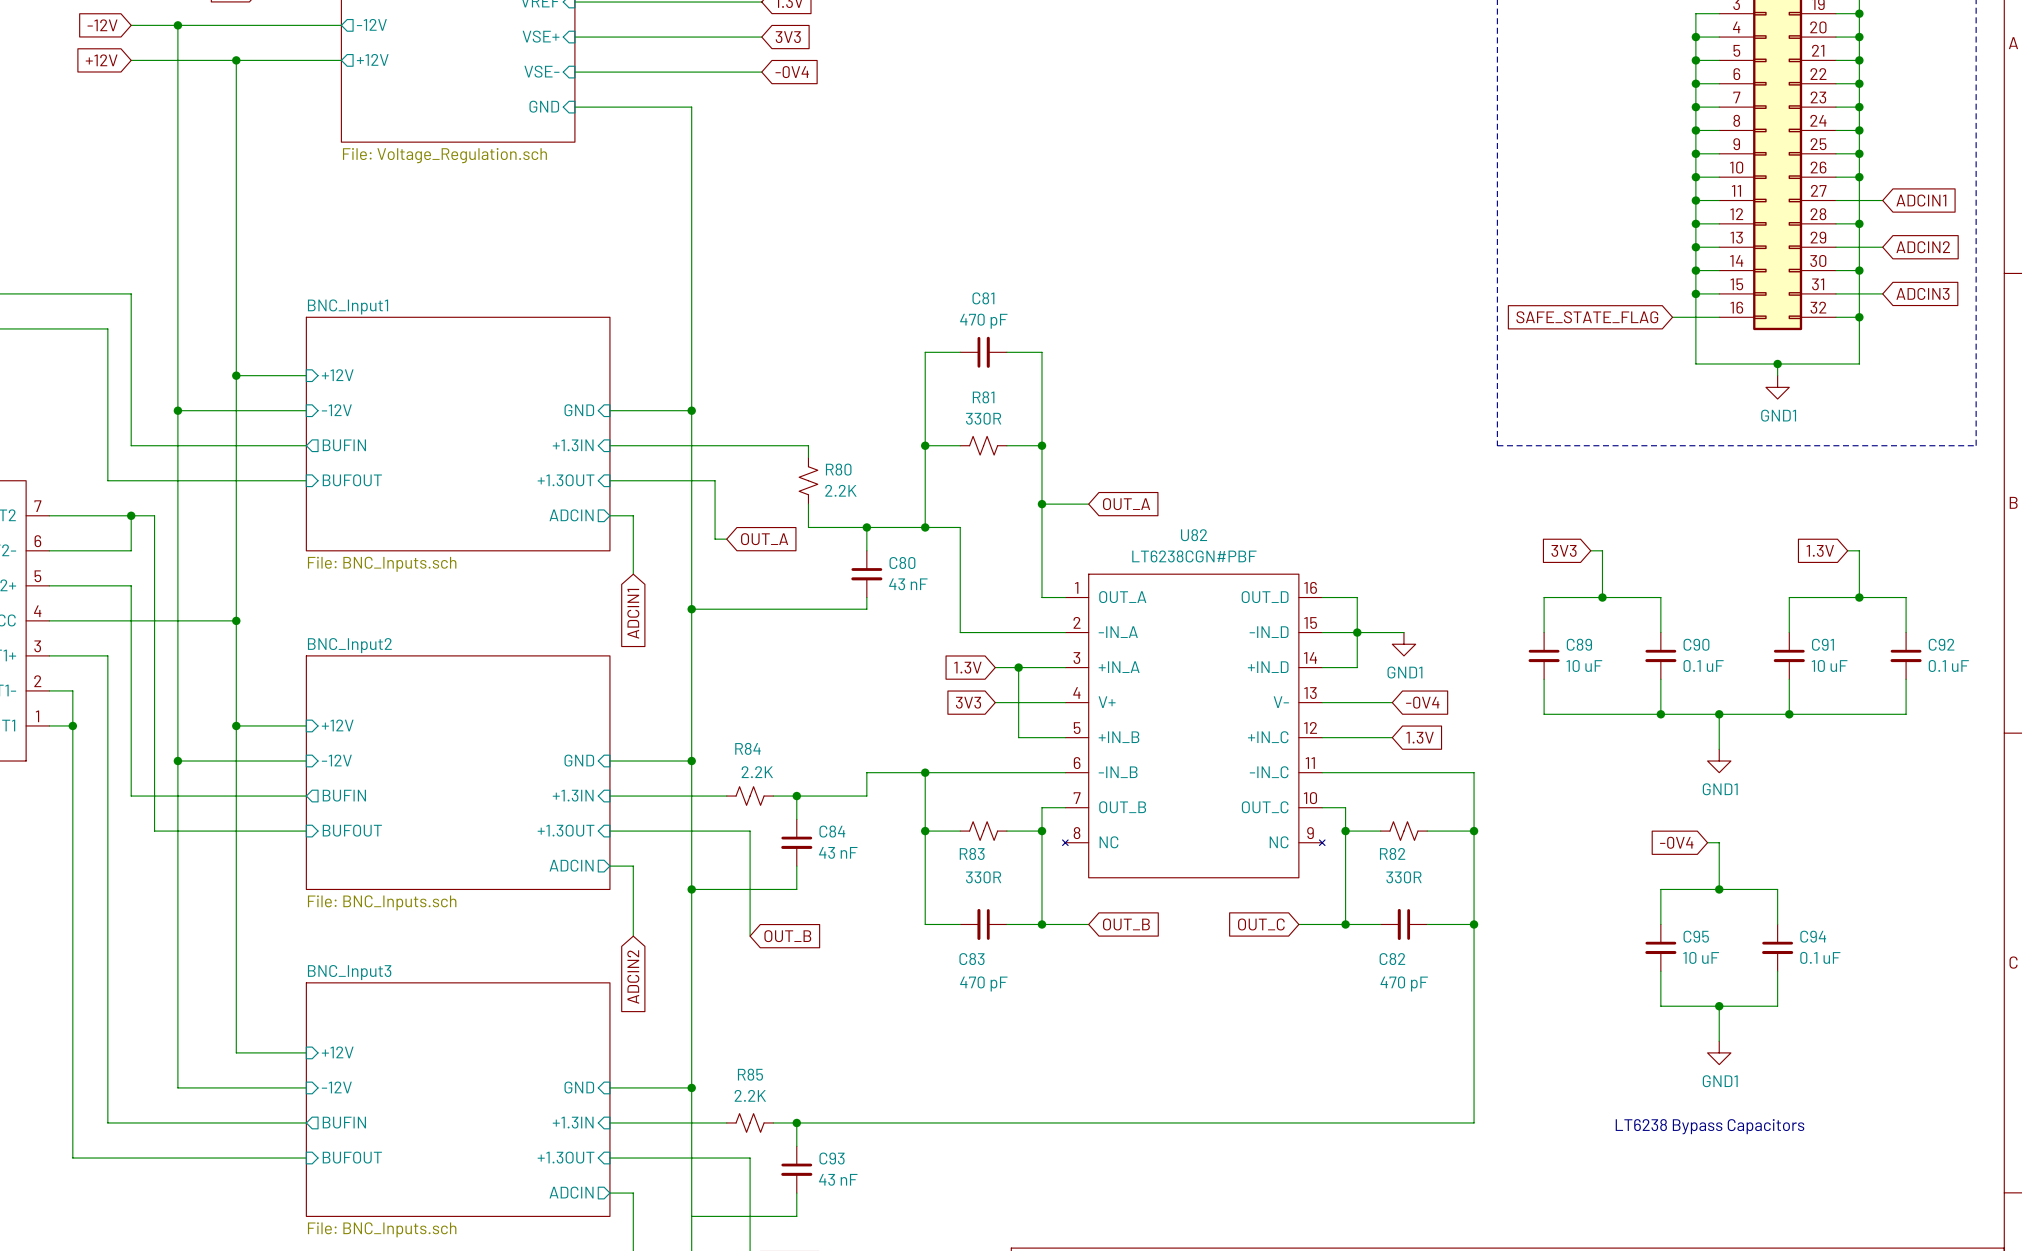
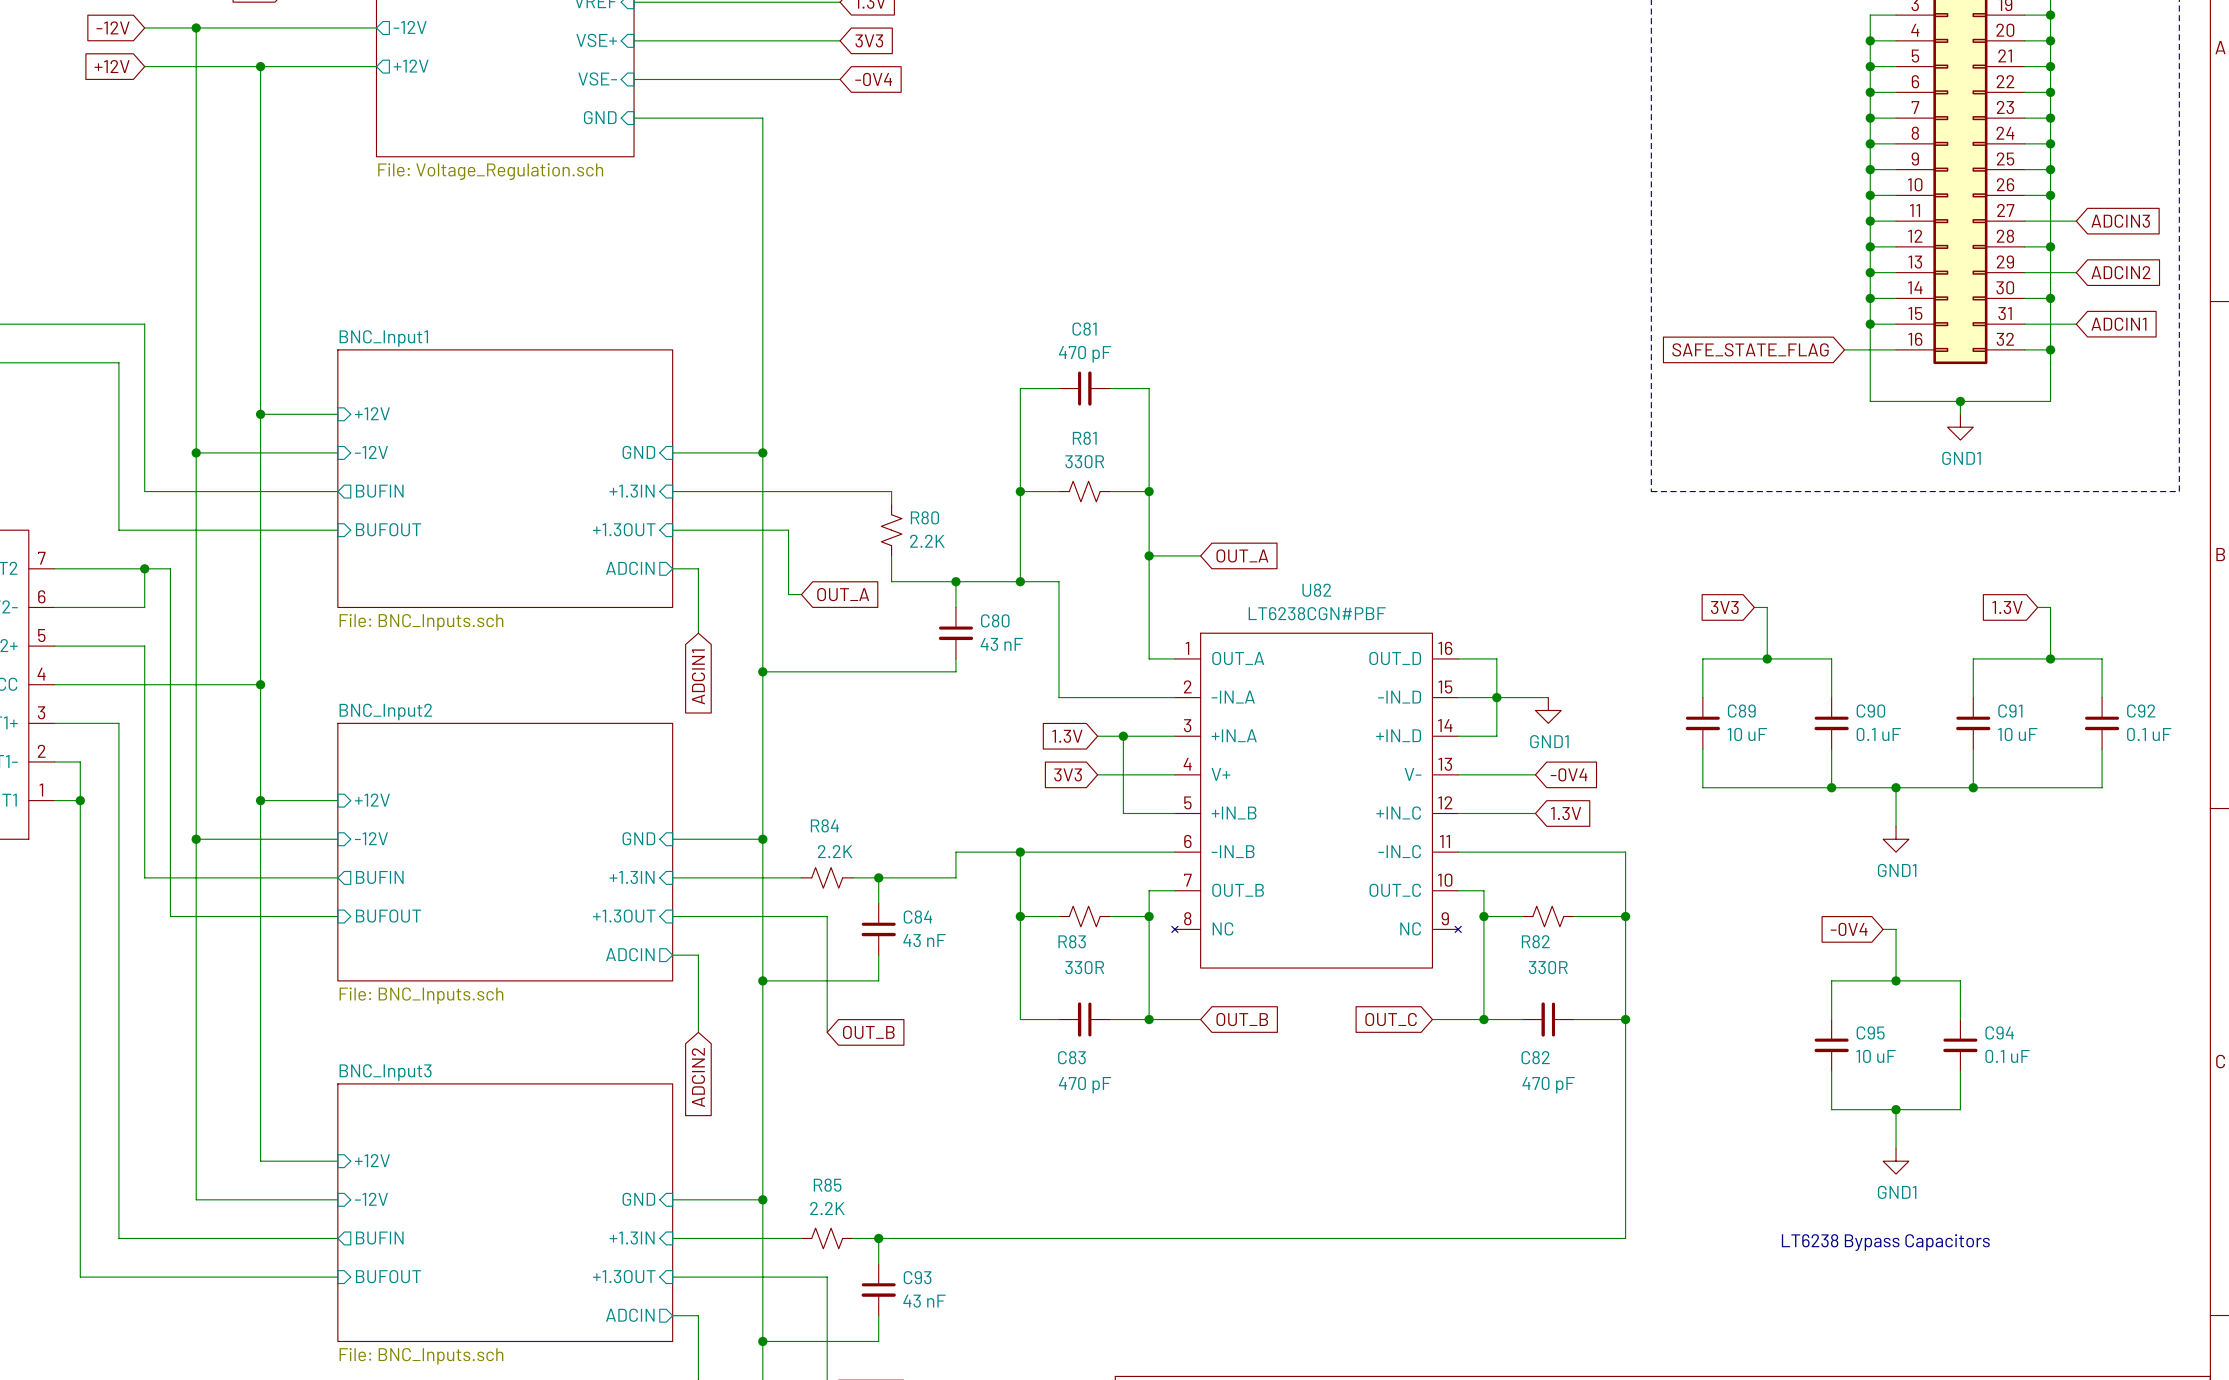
global label: ADCIN1 (1921, 200) -> ADCIN3 (2120, 221)
global label: ADCIN3 (1922, 293) -> ADCIN1 (2118, 324)
junction: none -> (762, 1341)

